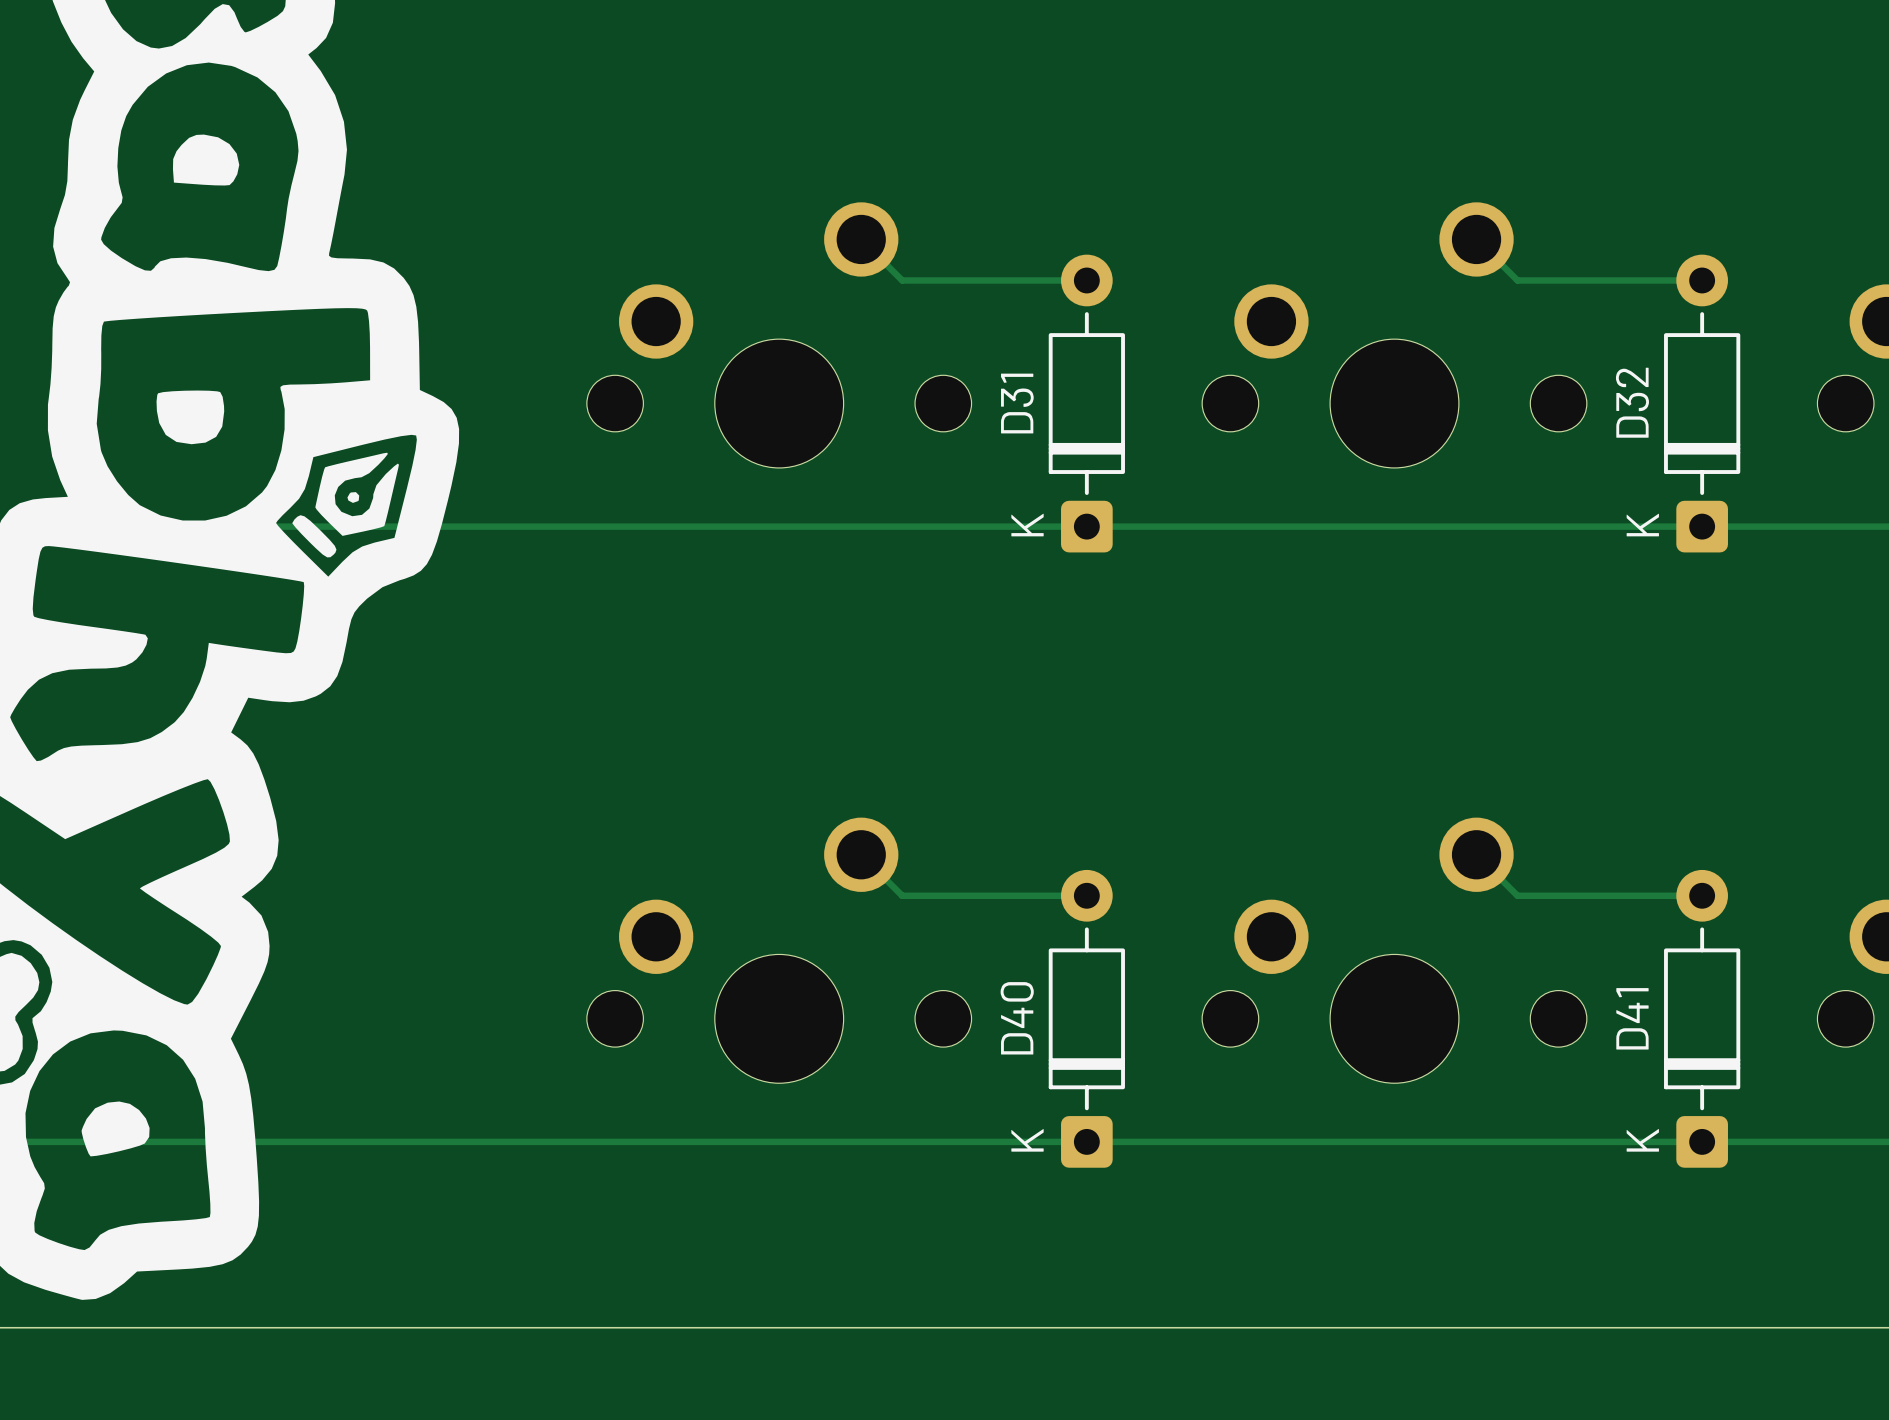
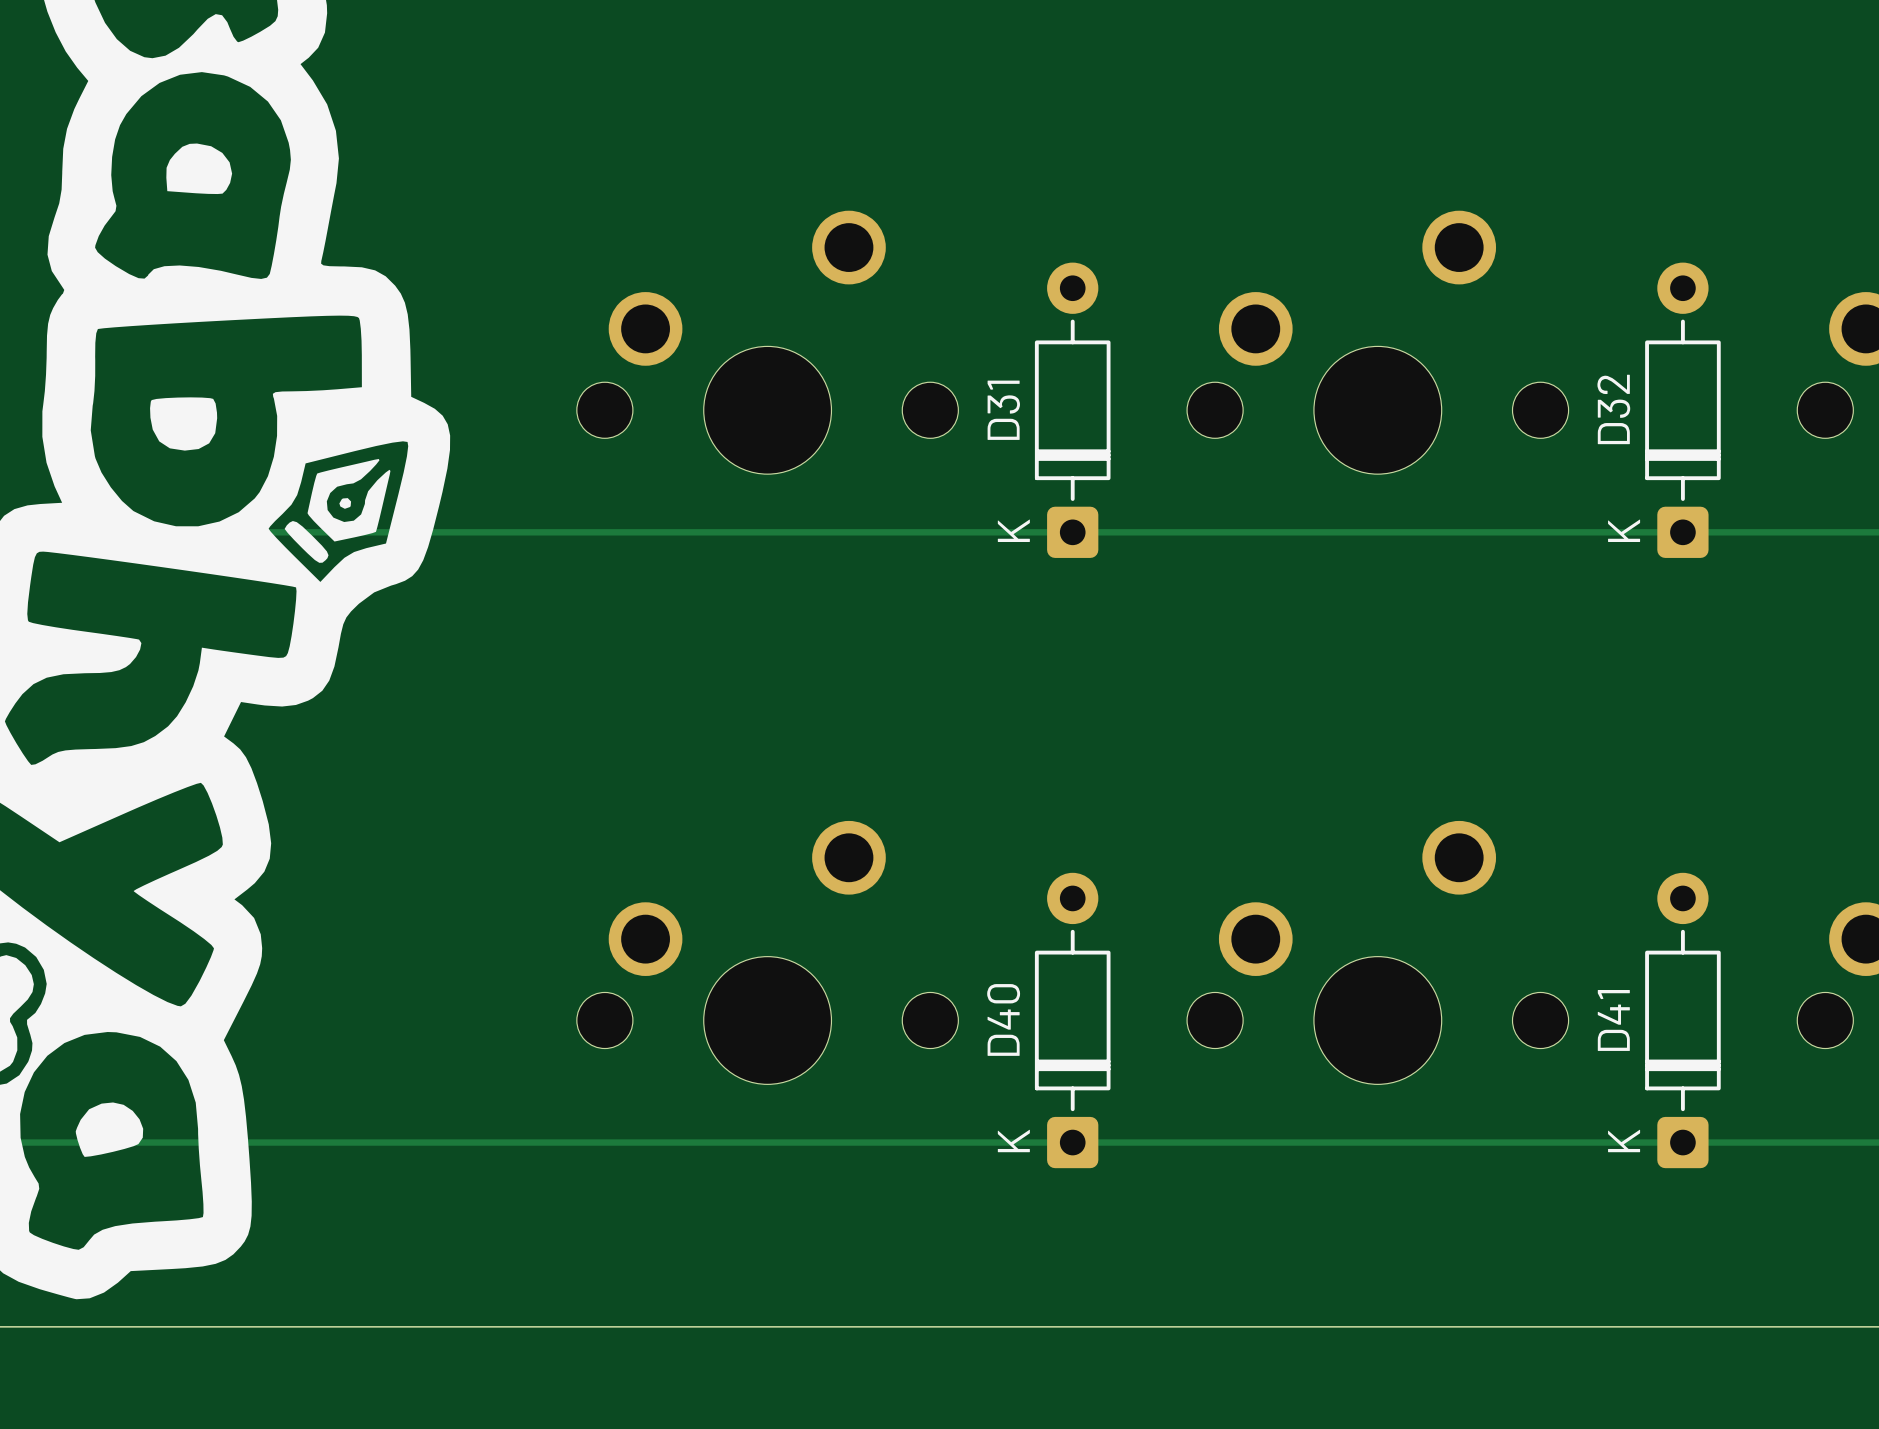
track: (861, 239) (902, 280) (1086, 280) -> none
track: (1476, 239) (1517, 280) (1702, 280) -> none
track: (861, 854) (902, 895) (1086, 895) -> none
track: (1476, 854) (1517, 895) (1702, 895) -> none

